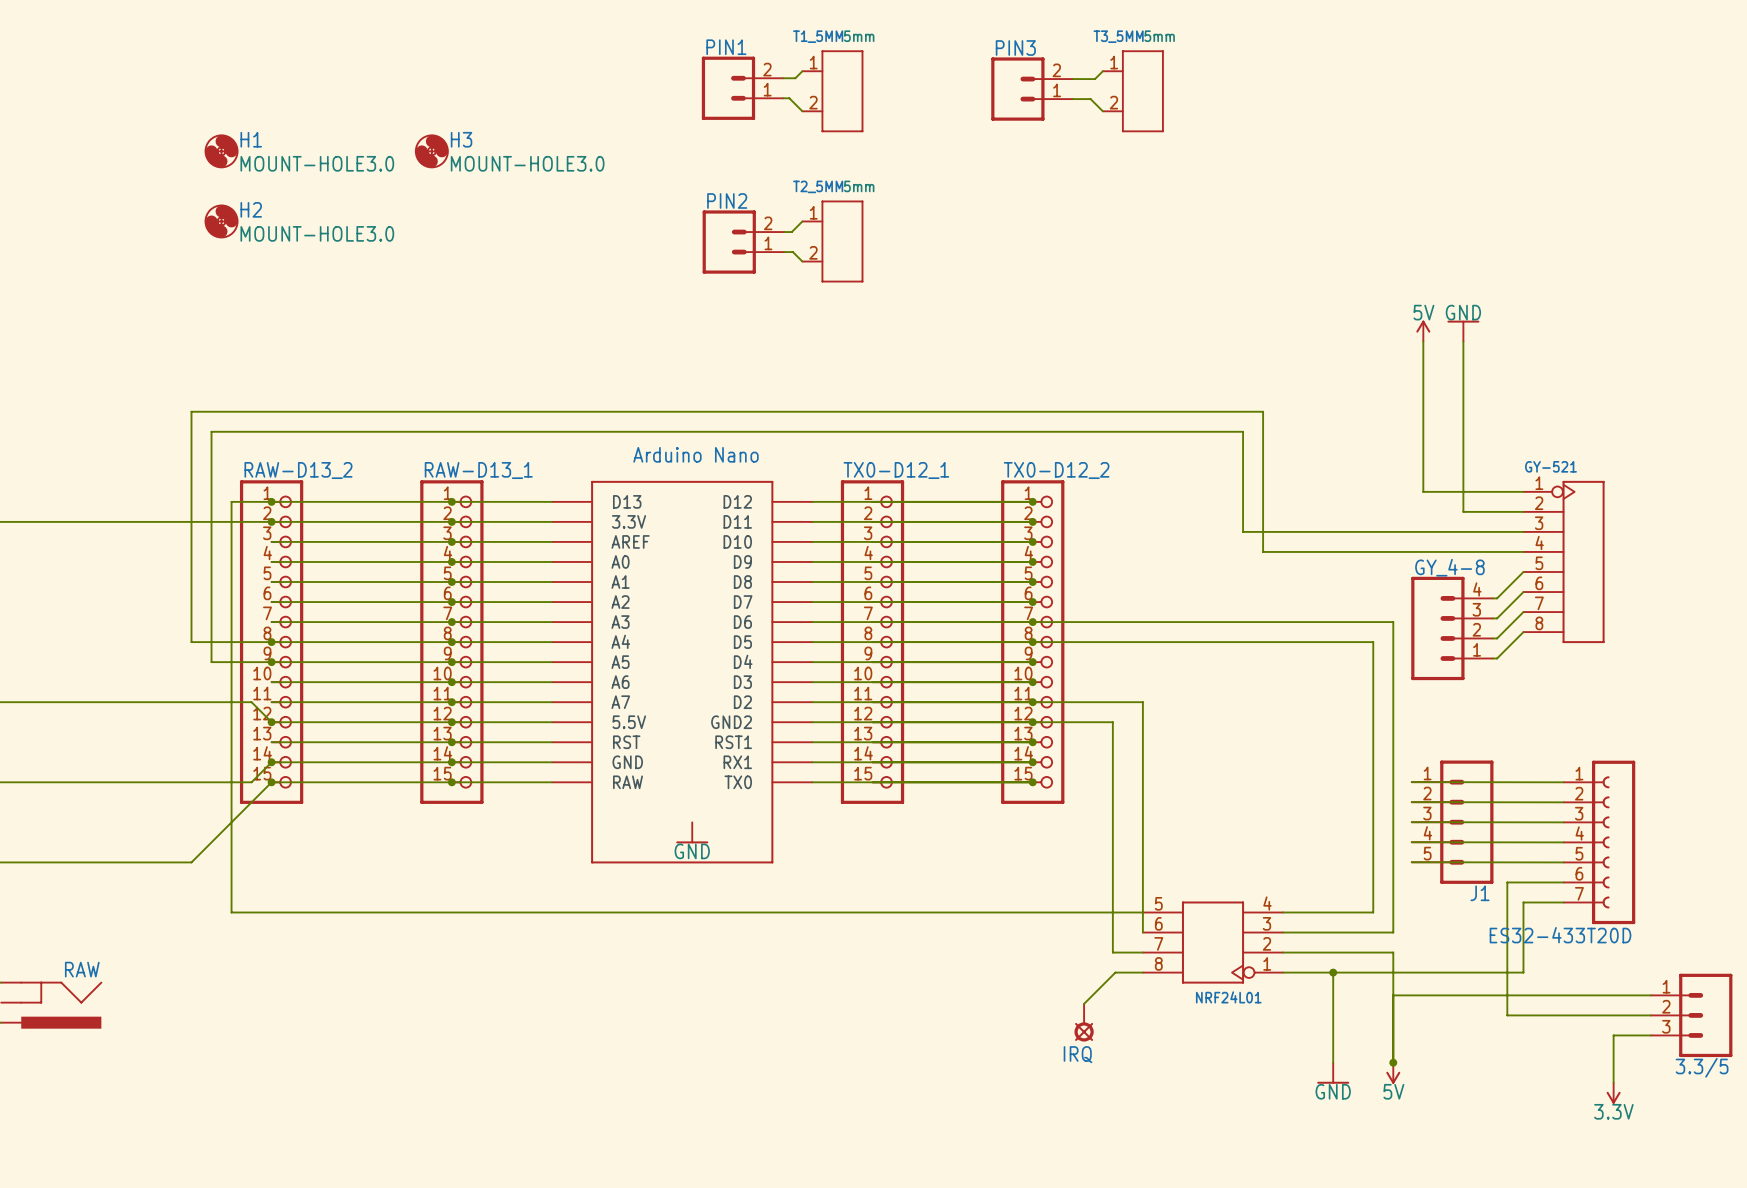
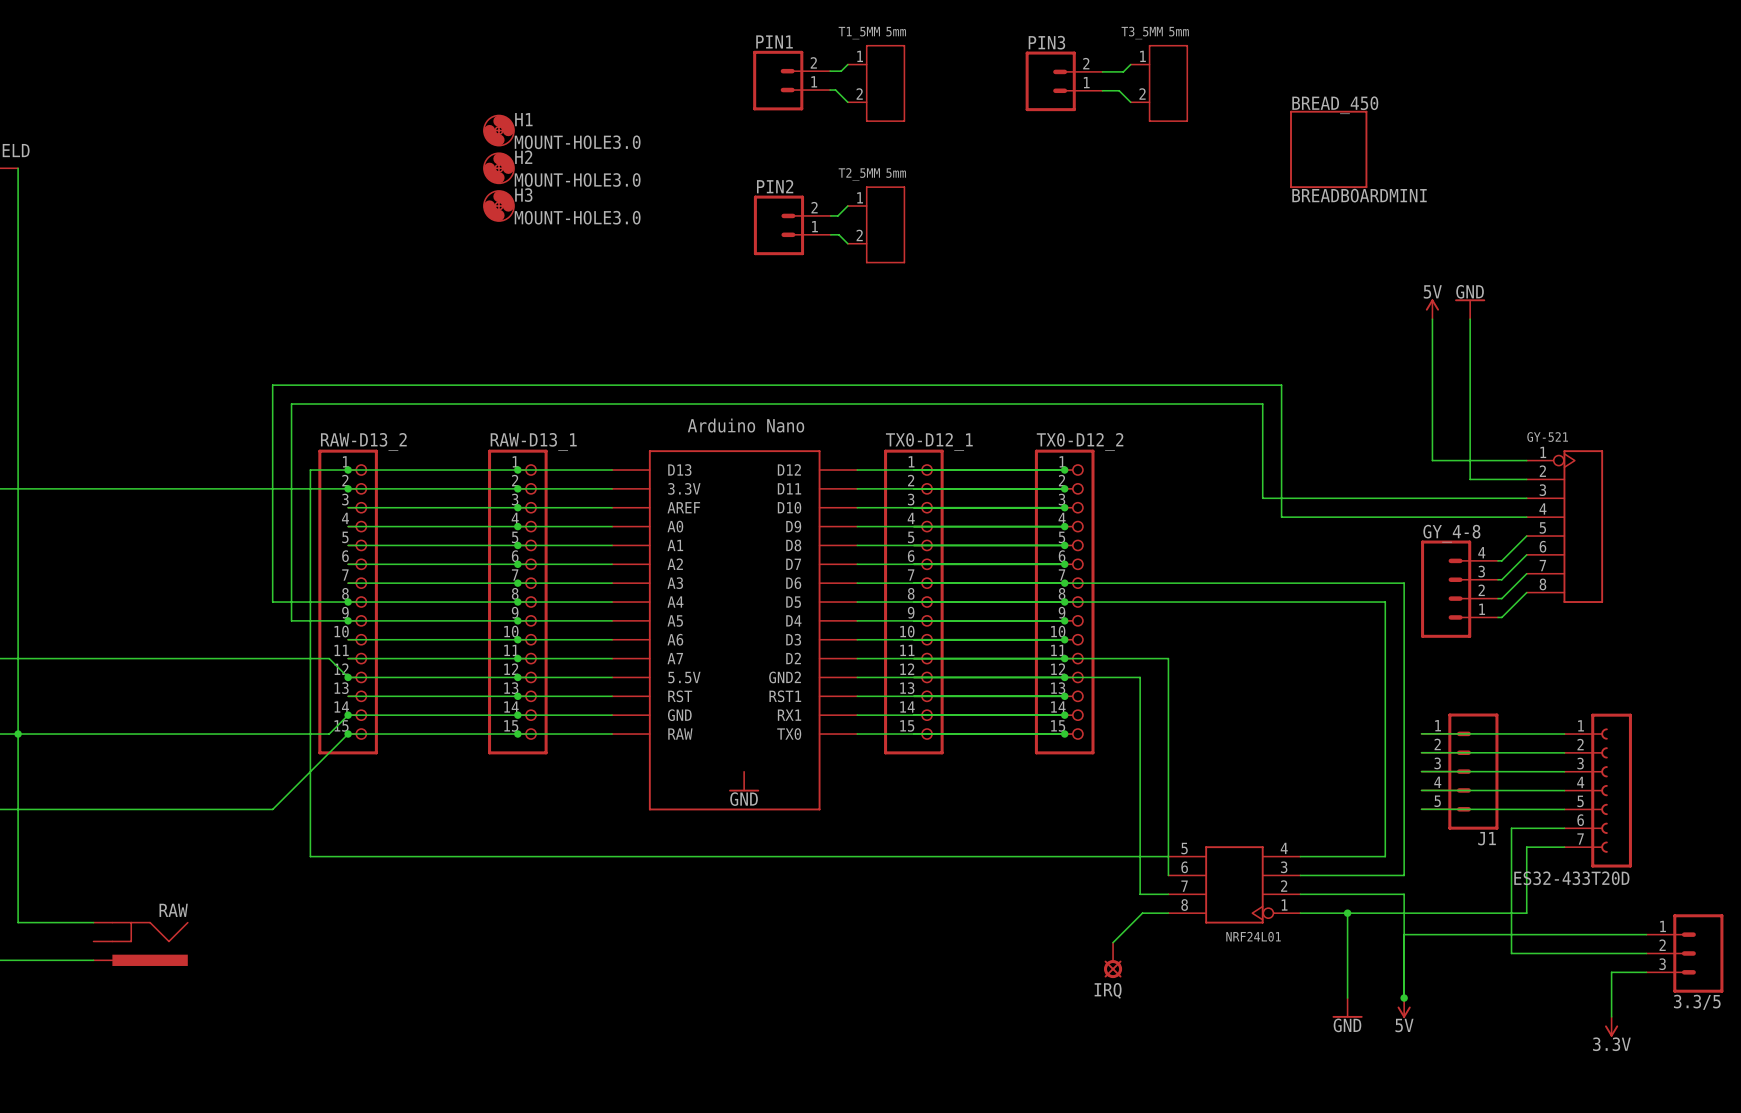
H1 position: (221, 151) -> (498, 130)
H3 position: (431, 151) -> (498, 206)
BREAD_450: none -> BREADBOARDMINI (1328, 149)
H2 position: (221, 221) -> (498, 168)

